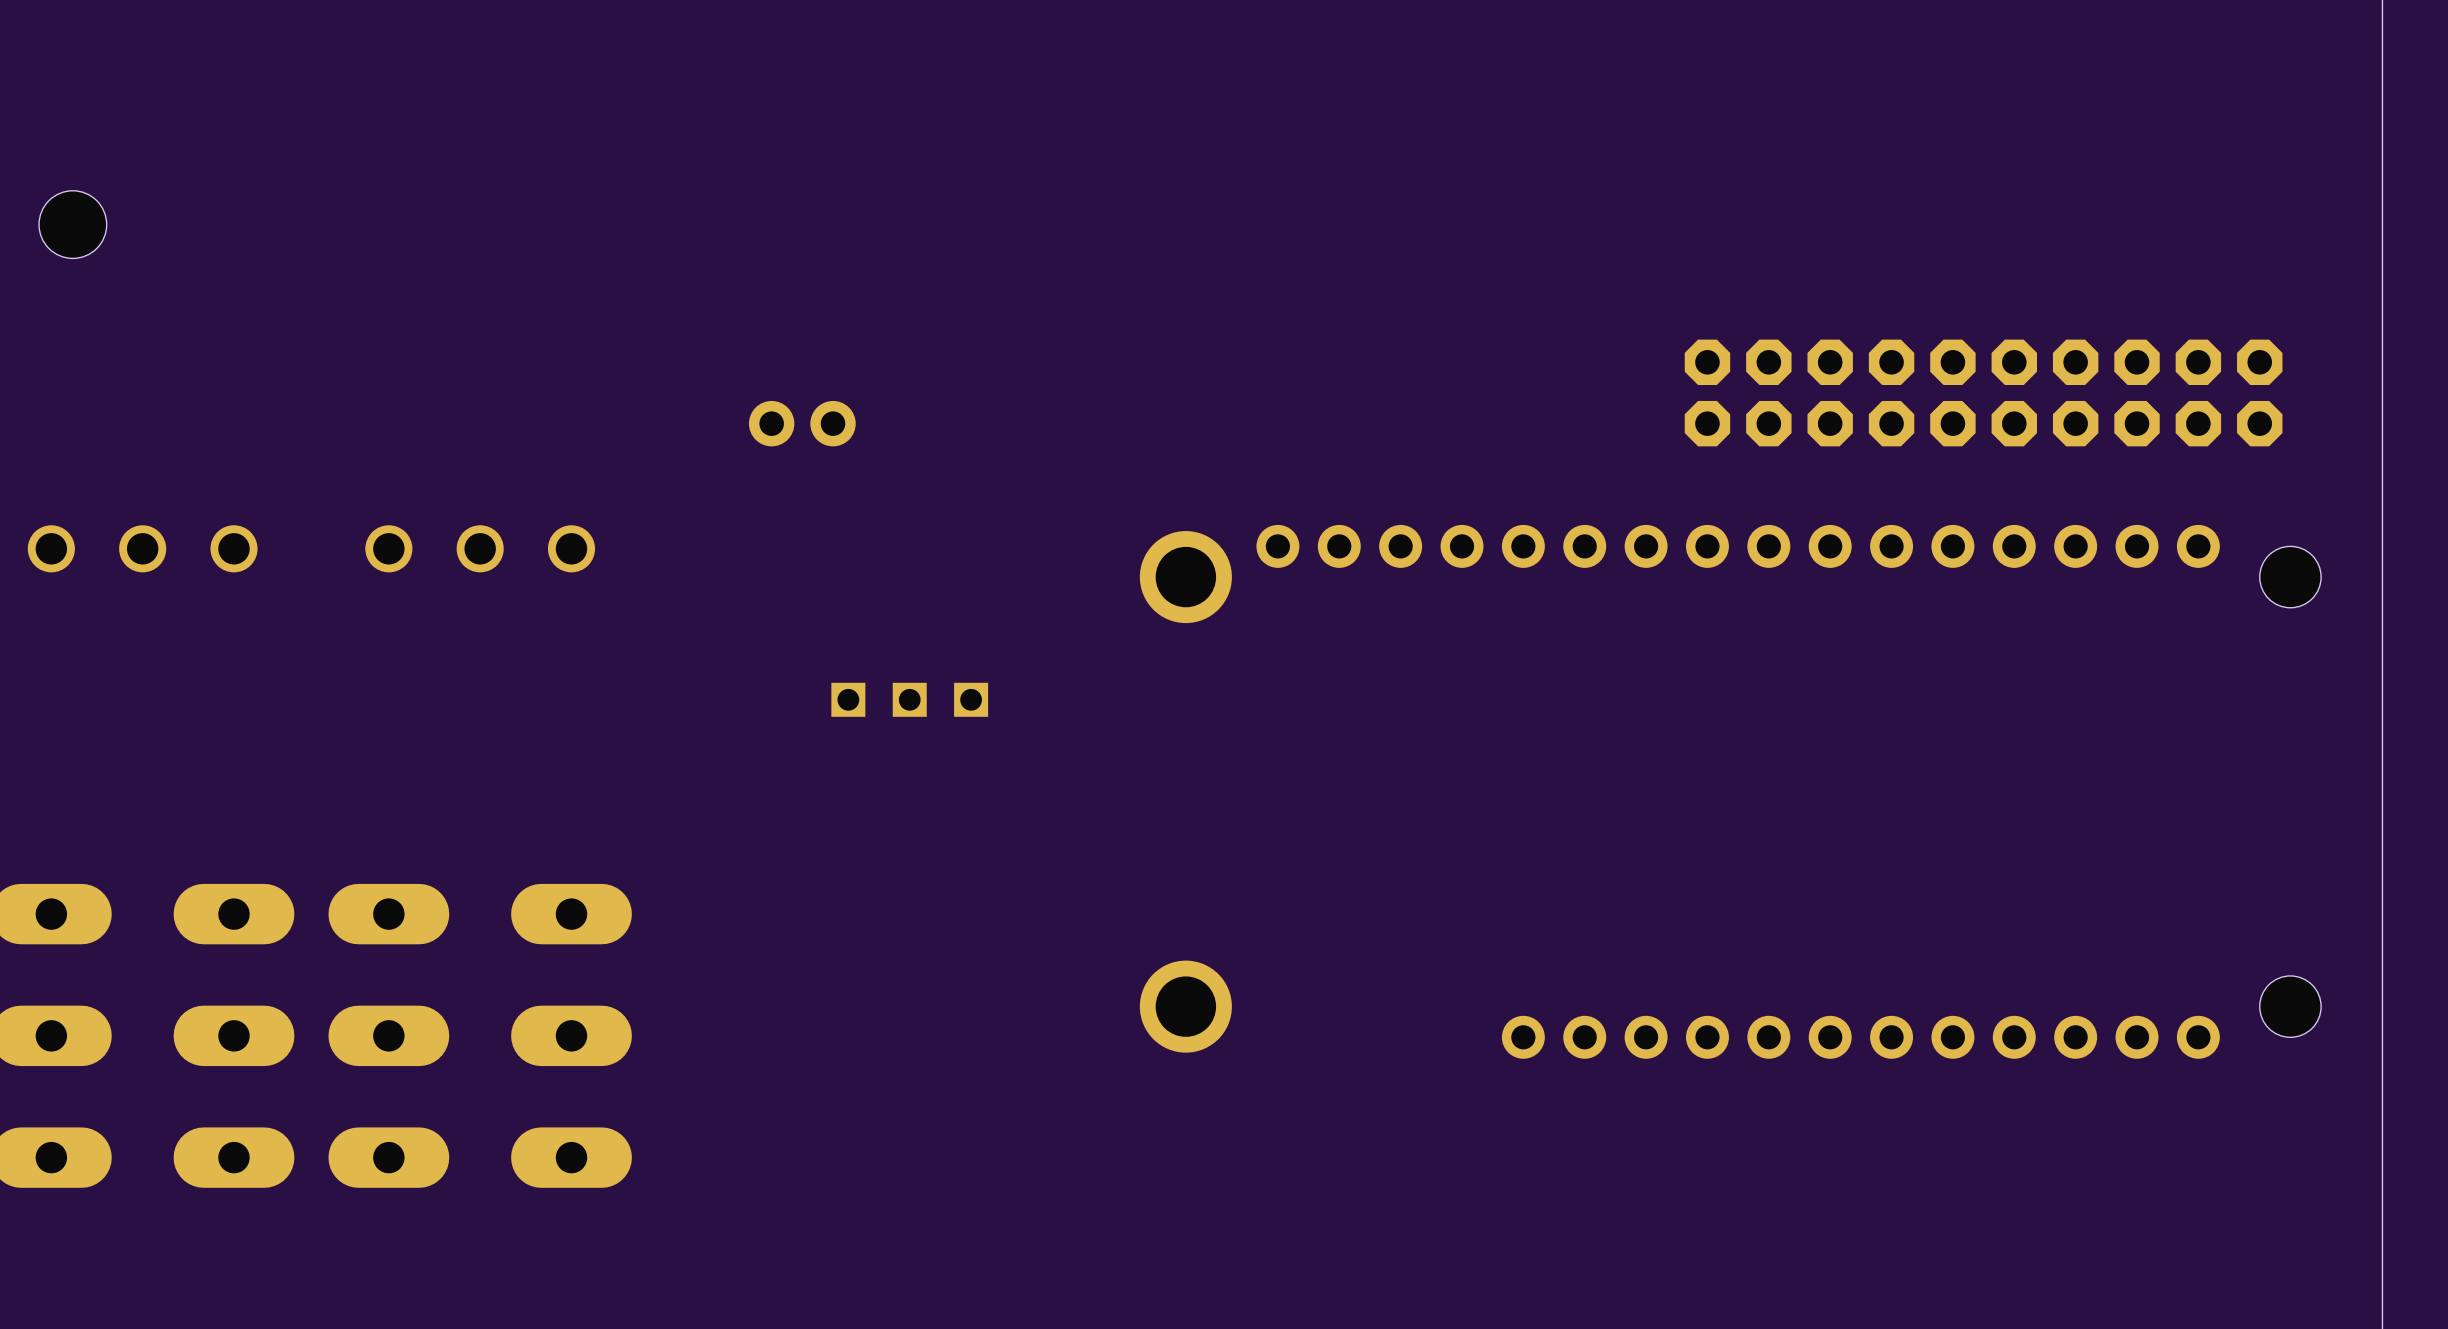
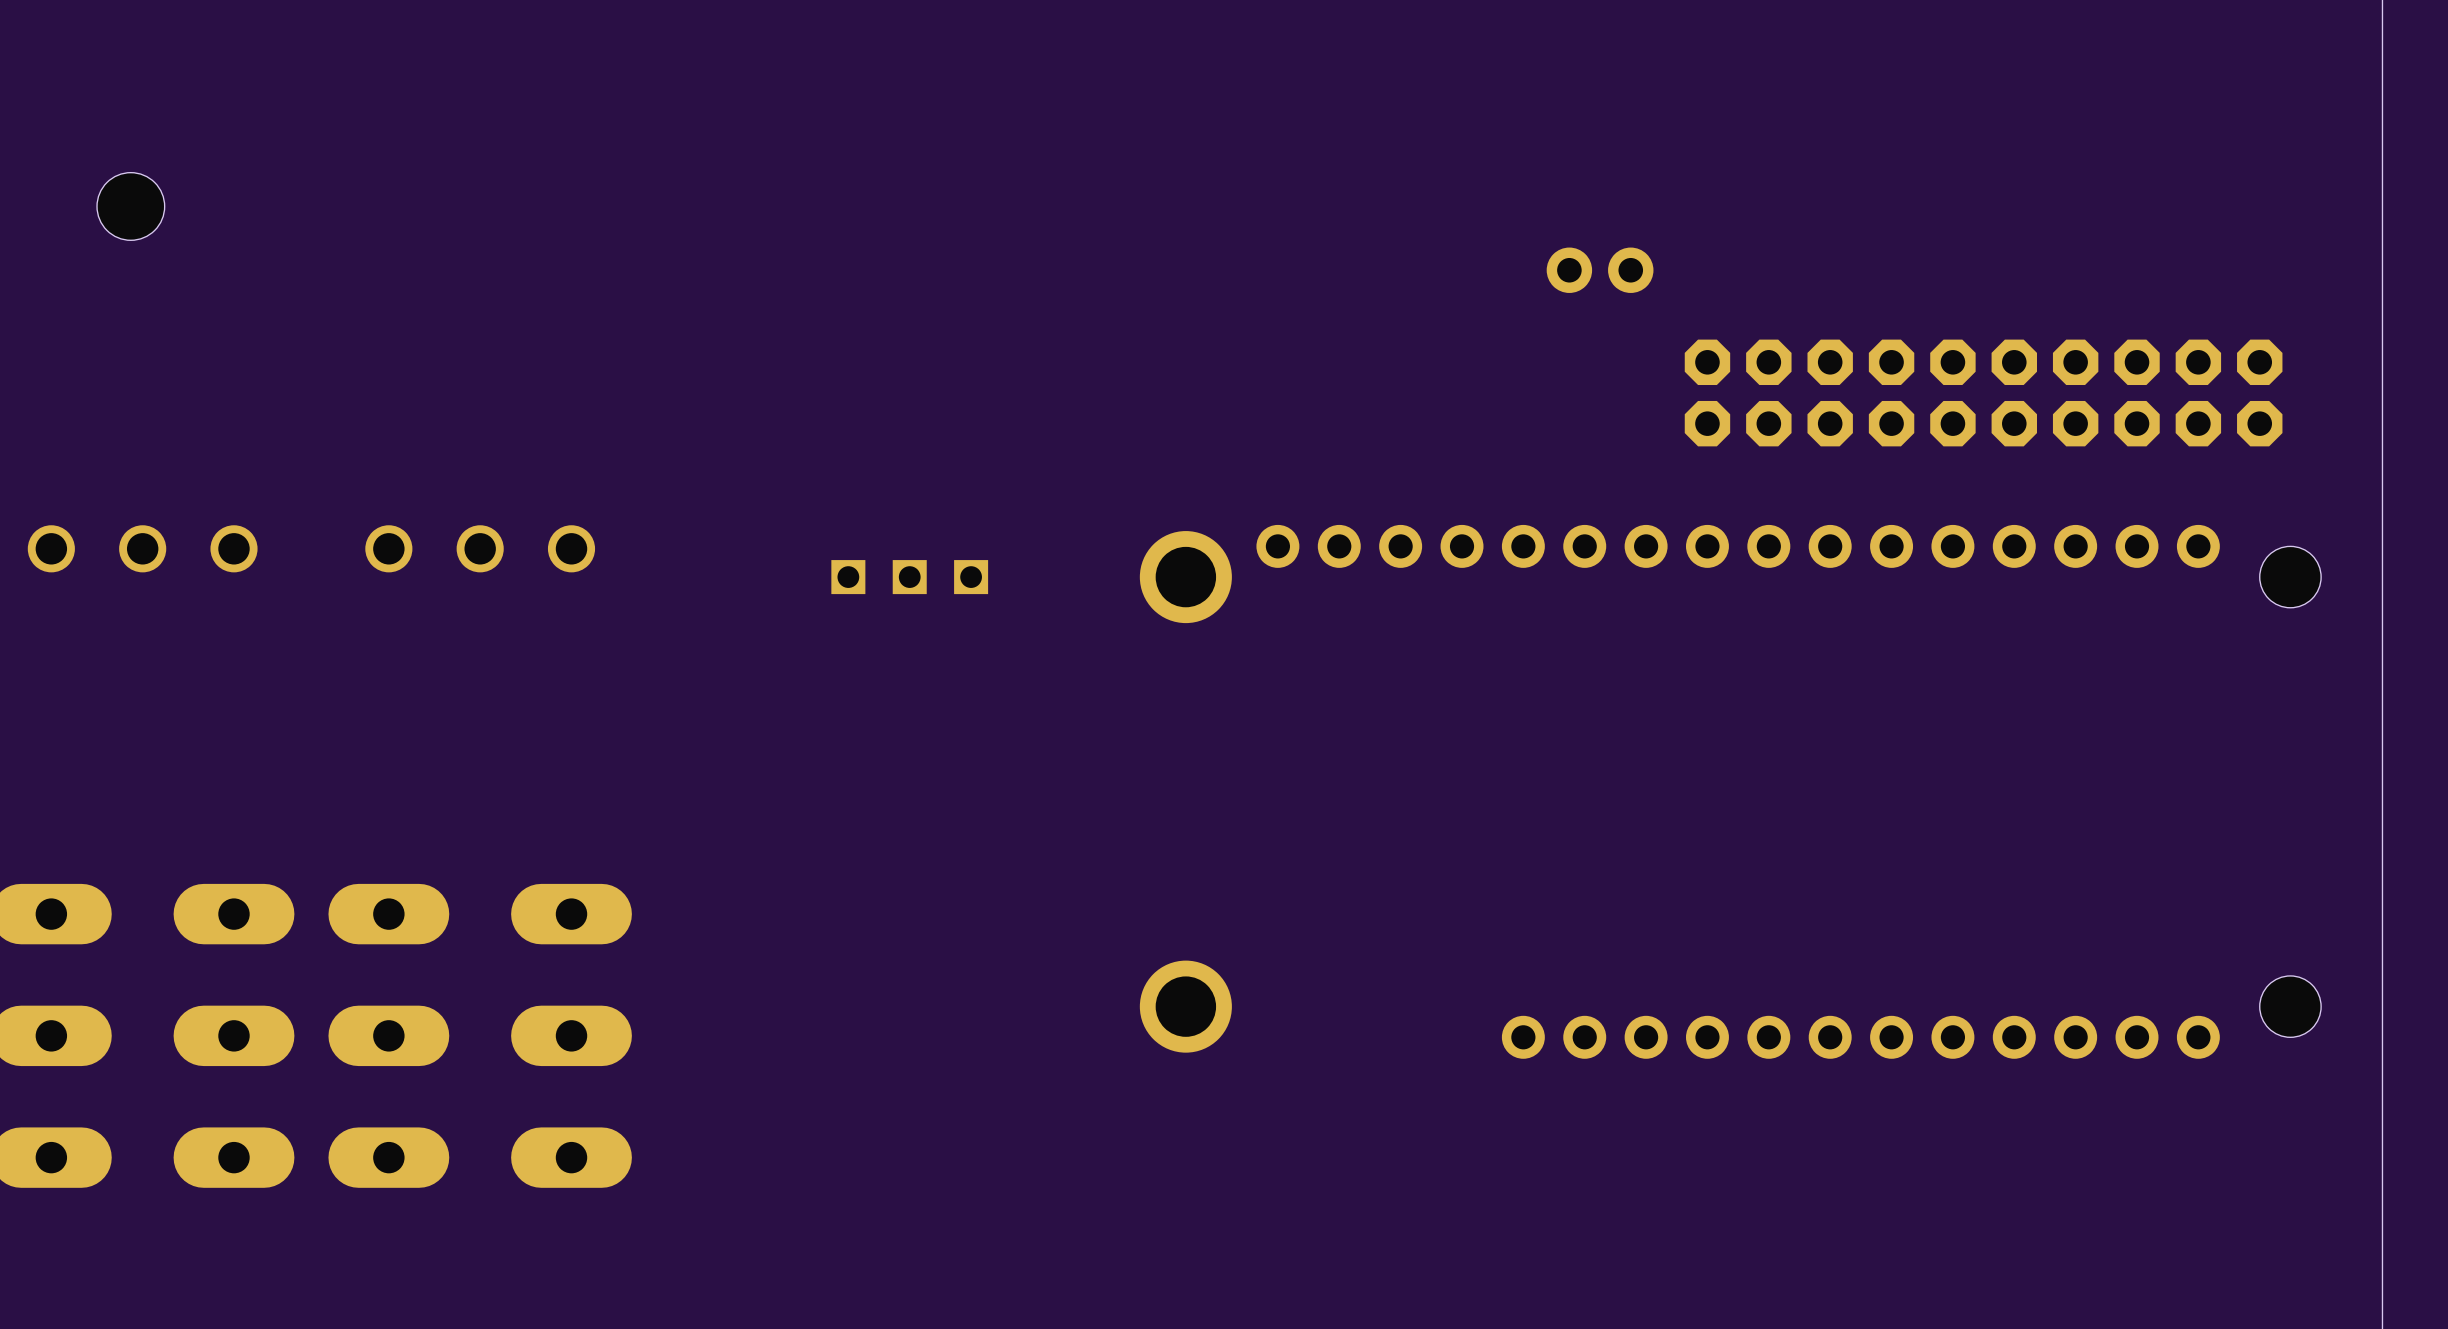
hole position: (72, 224) -> (130, 206)
part: none -> (1600, 270)
part: (802, 423) -> none
part position: (909, 699) -> (909, 577)

